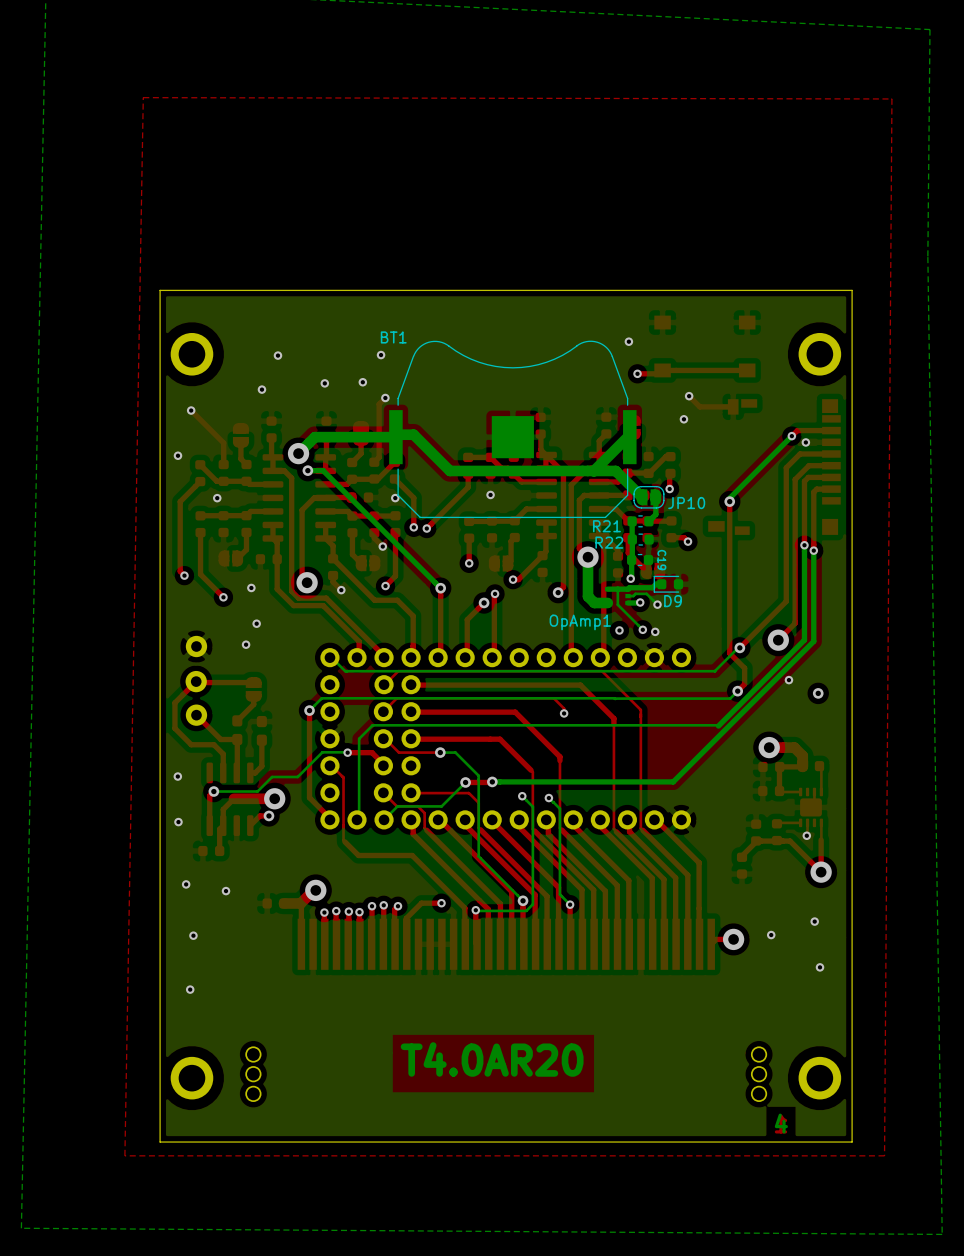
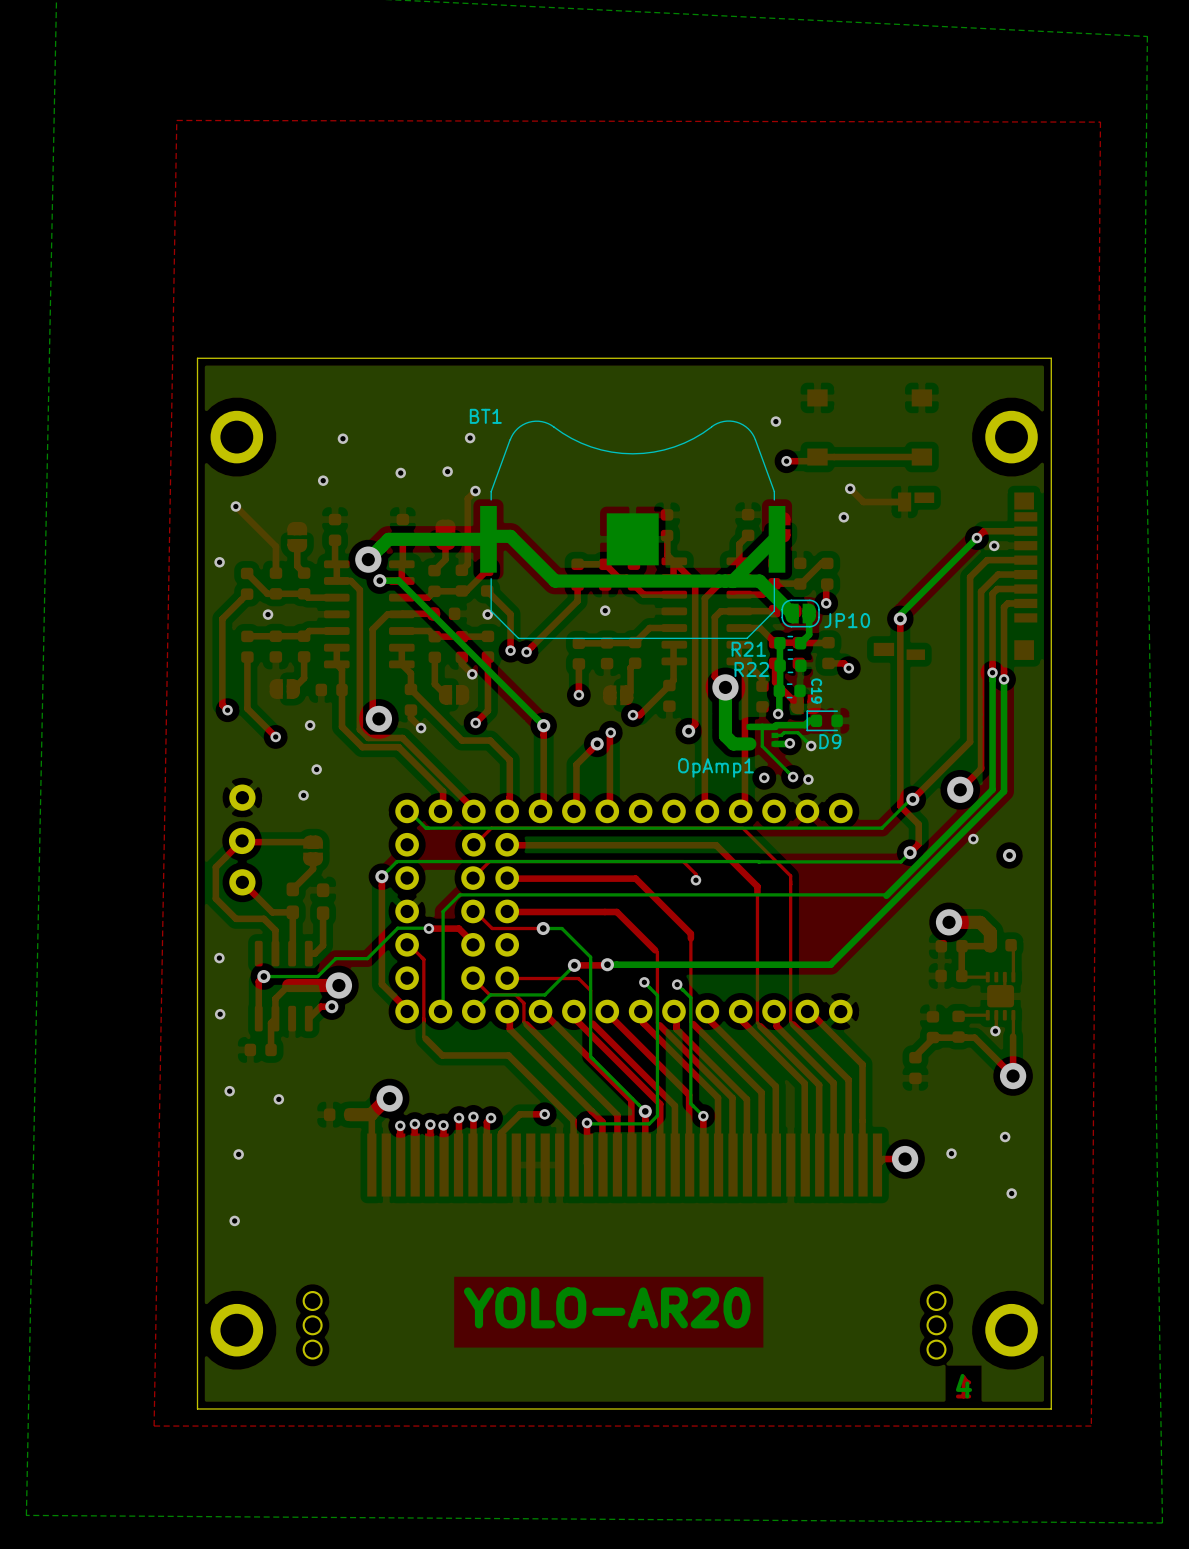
text: T4.0AR20 (492, 1059) -> YOLO-AR20 (607, 1307)

